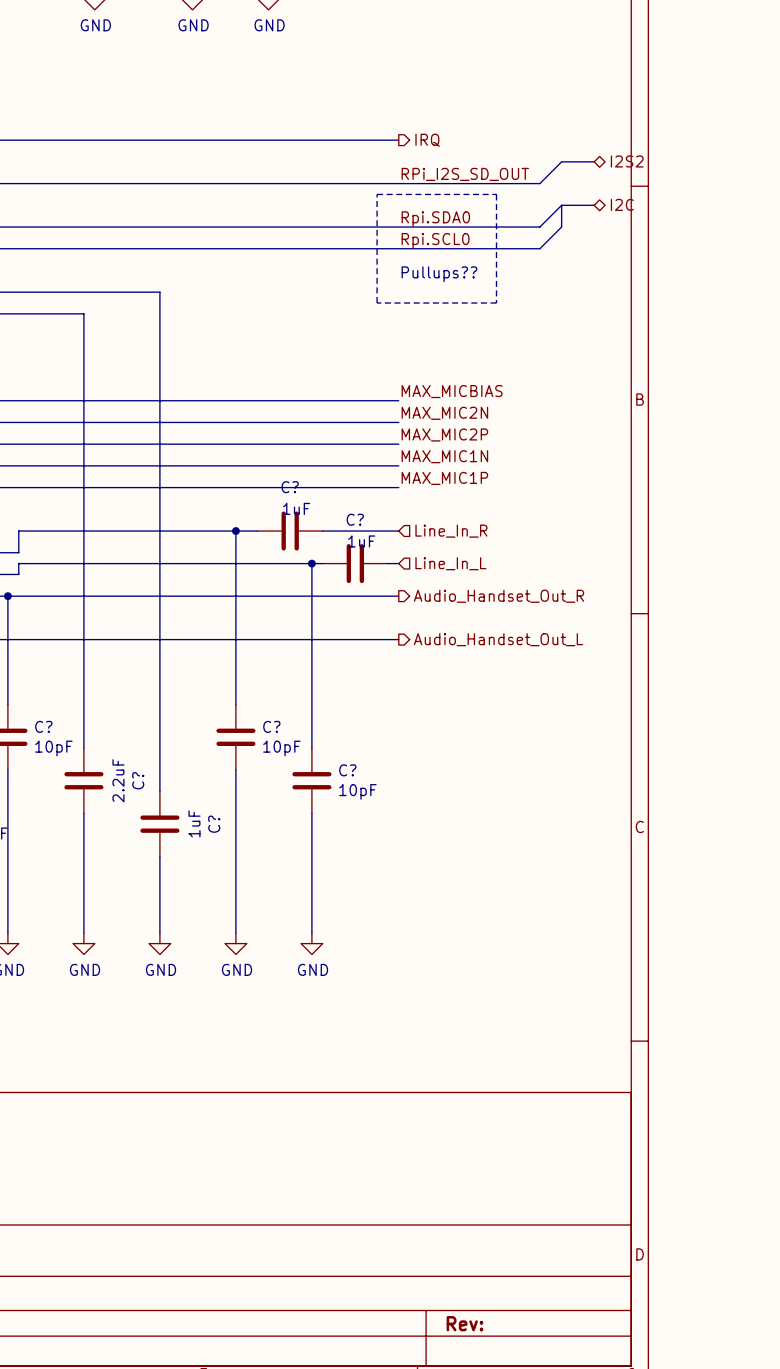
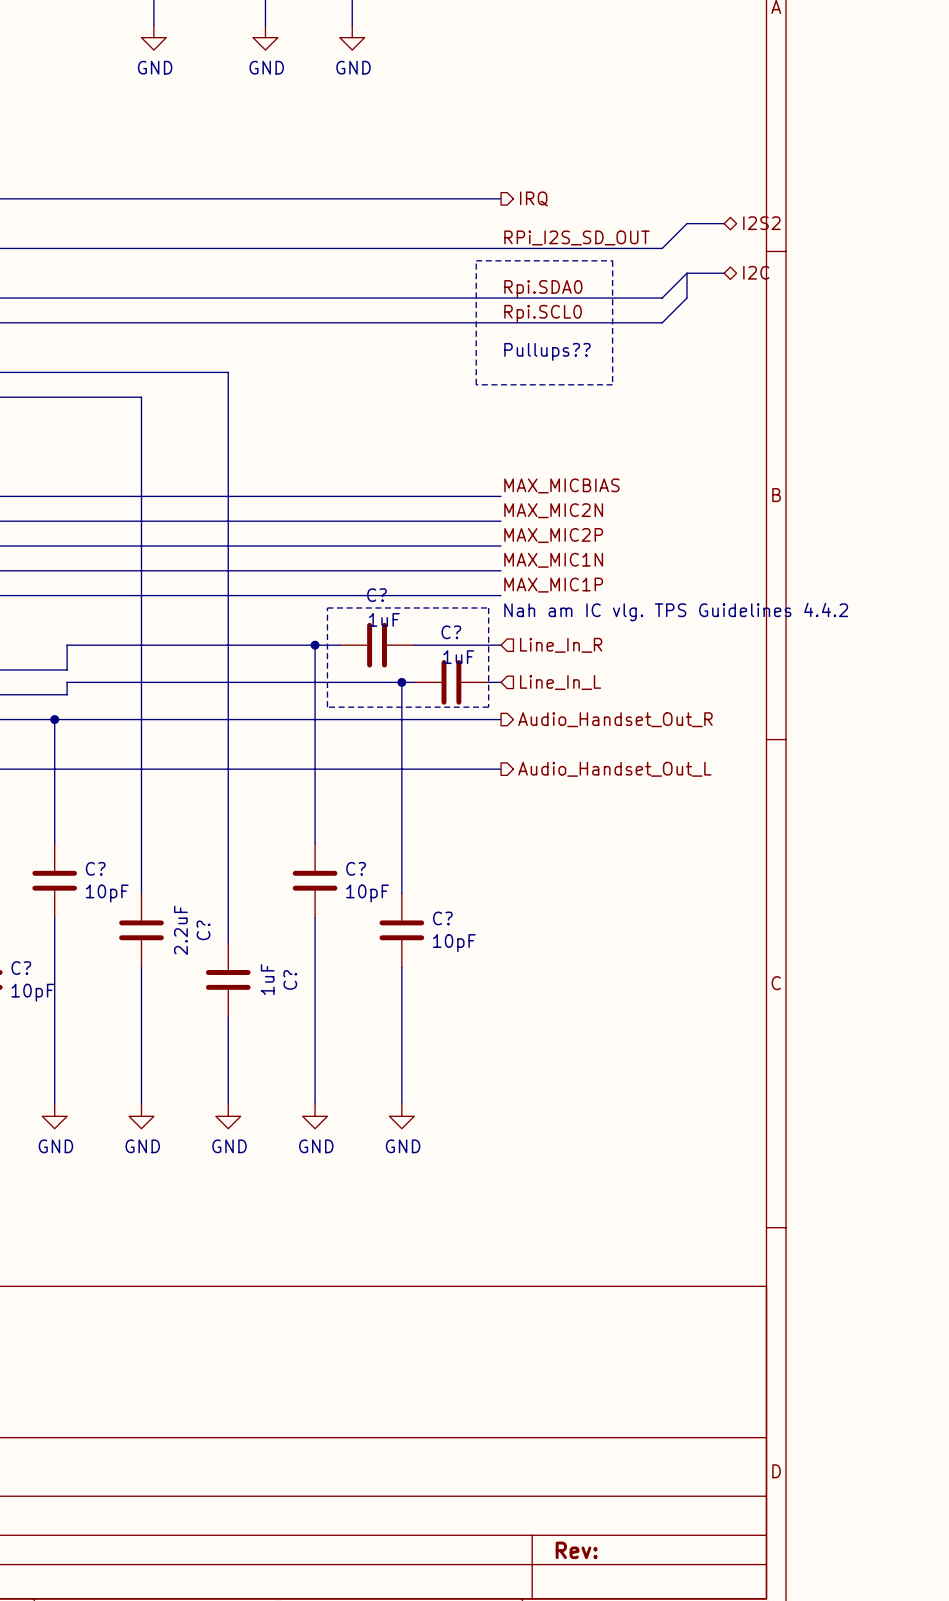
line: none -> (327, 607) (488, 607) (488, 707) (327, 707) (327, 607)
text: none -> Nah am IC vlg. TPS Guidelines 4.4.2 (676, 612)

